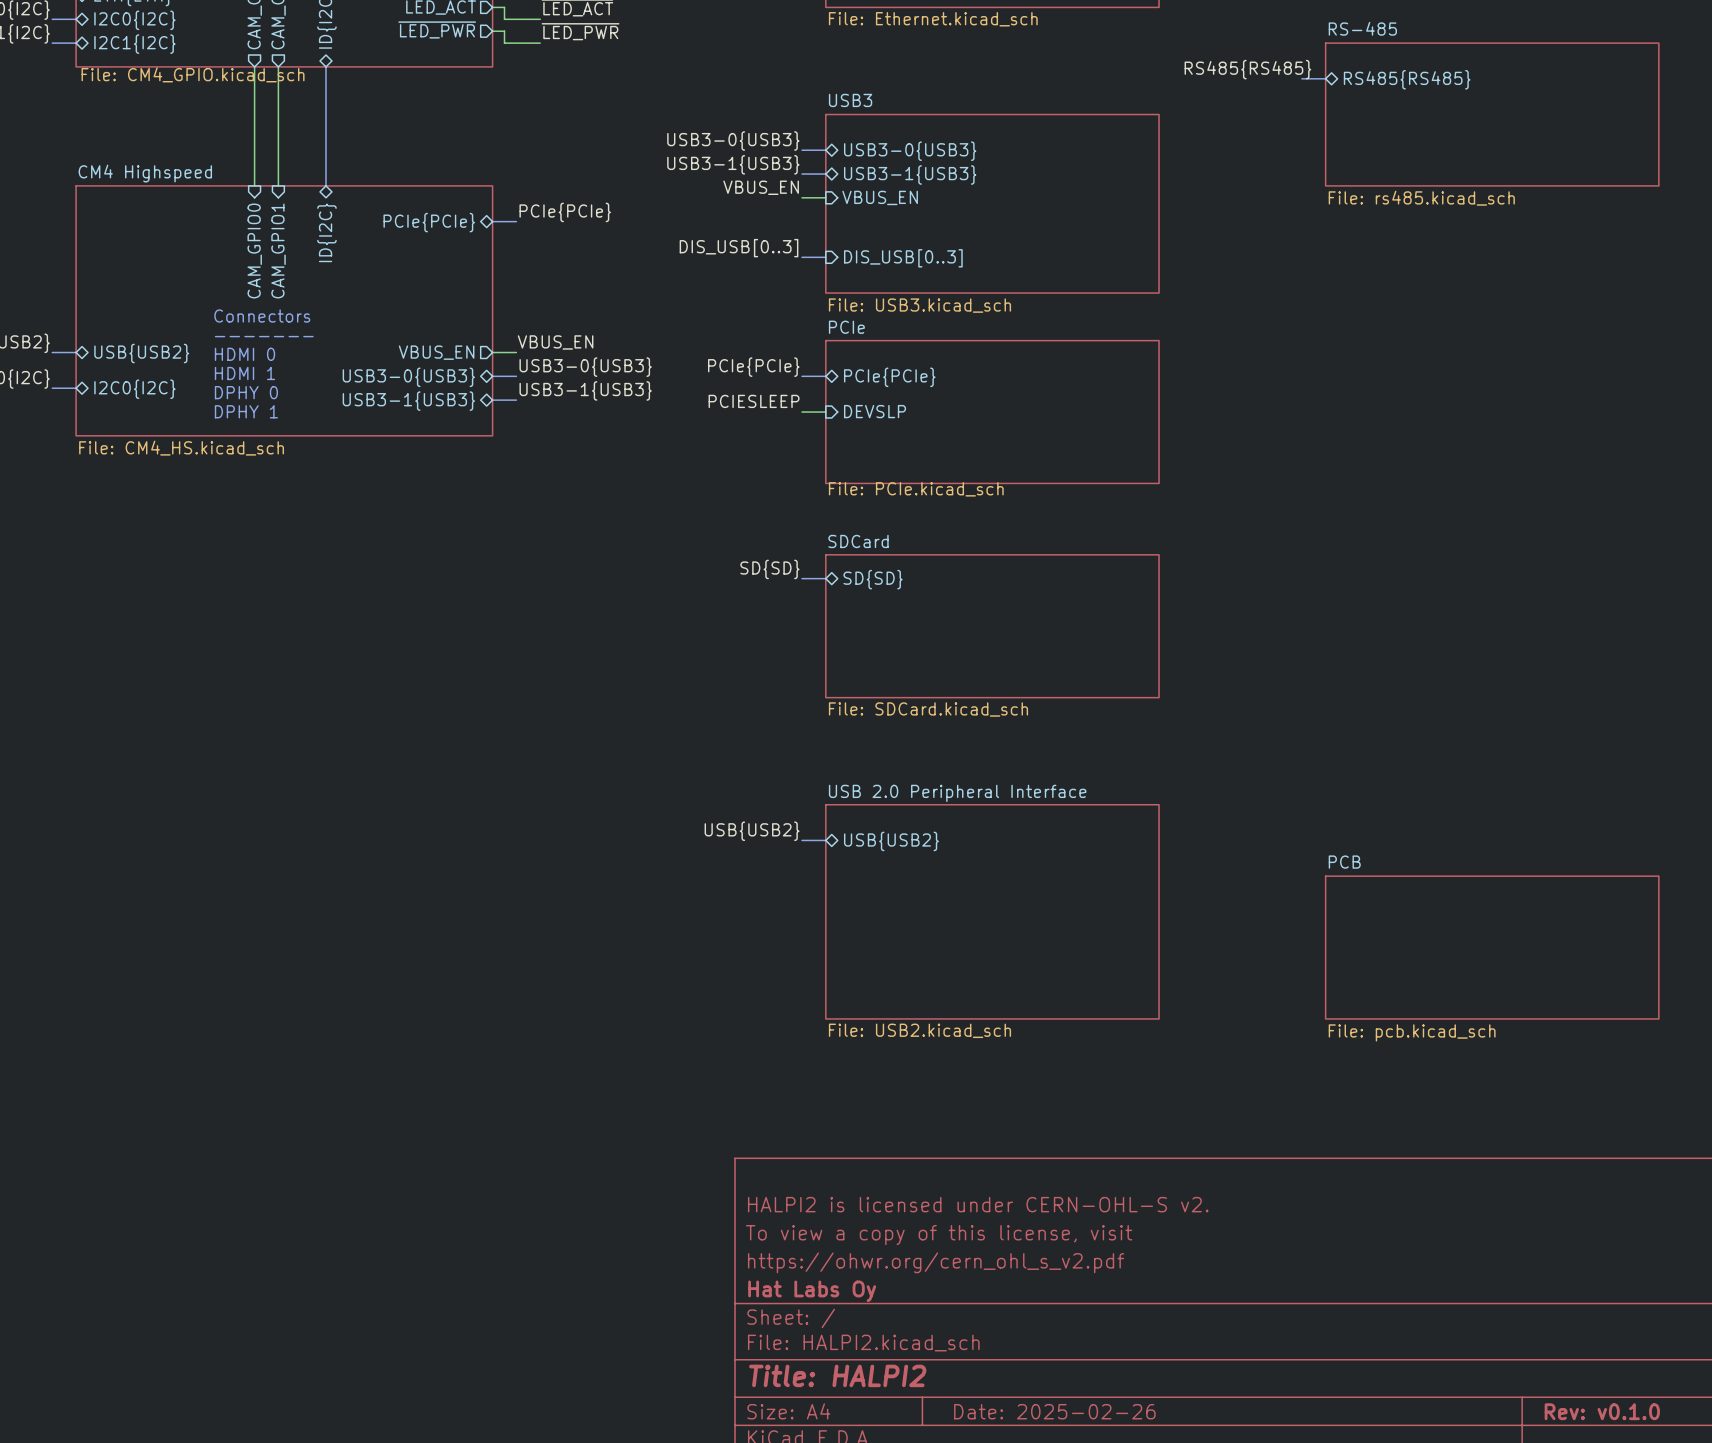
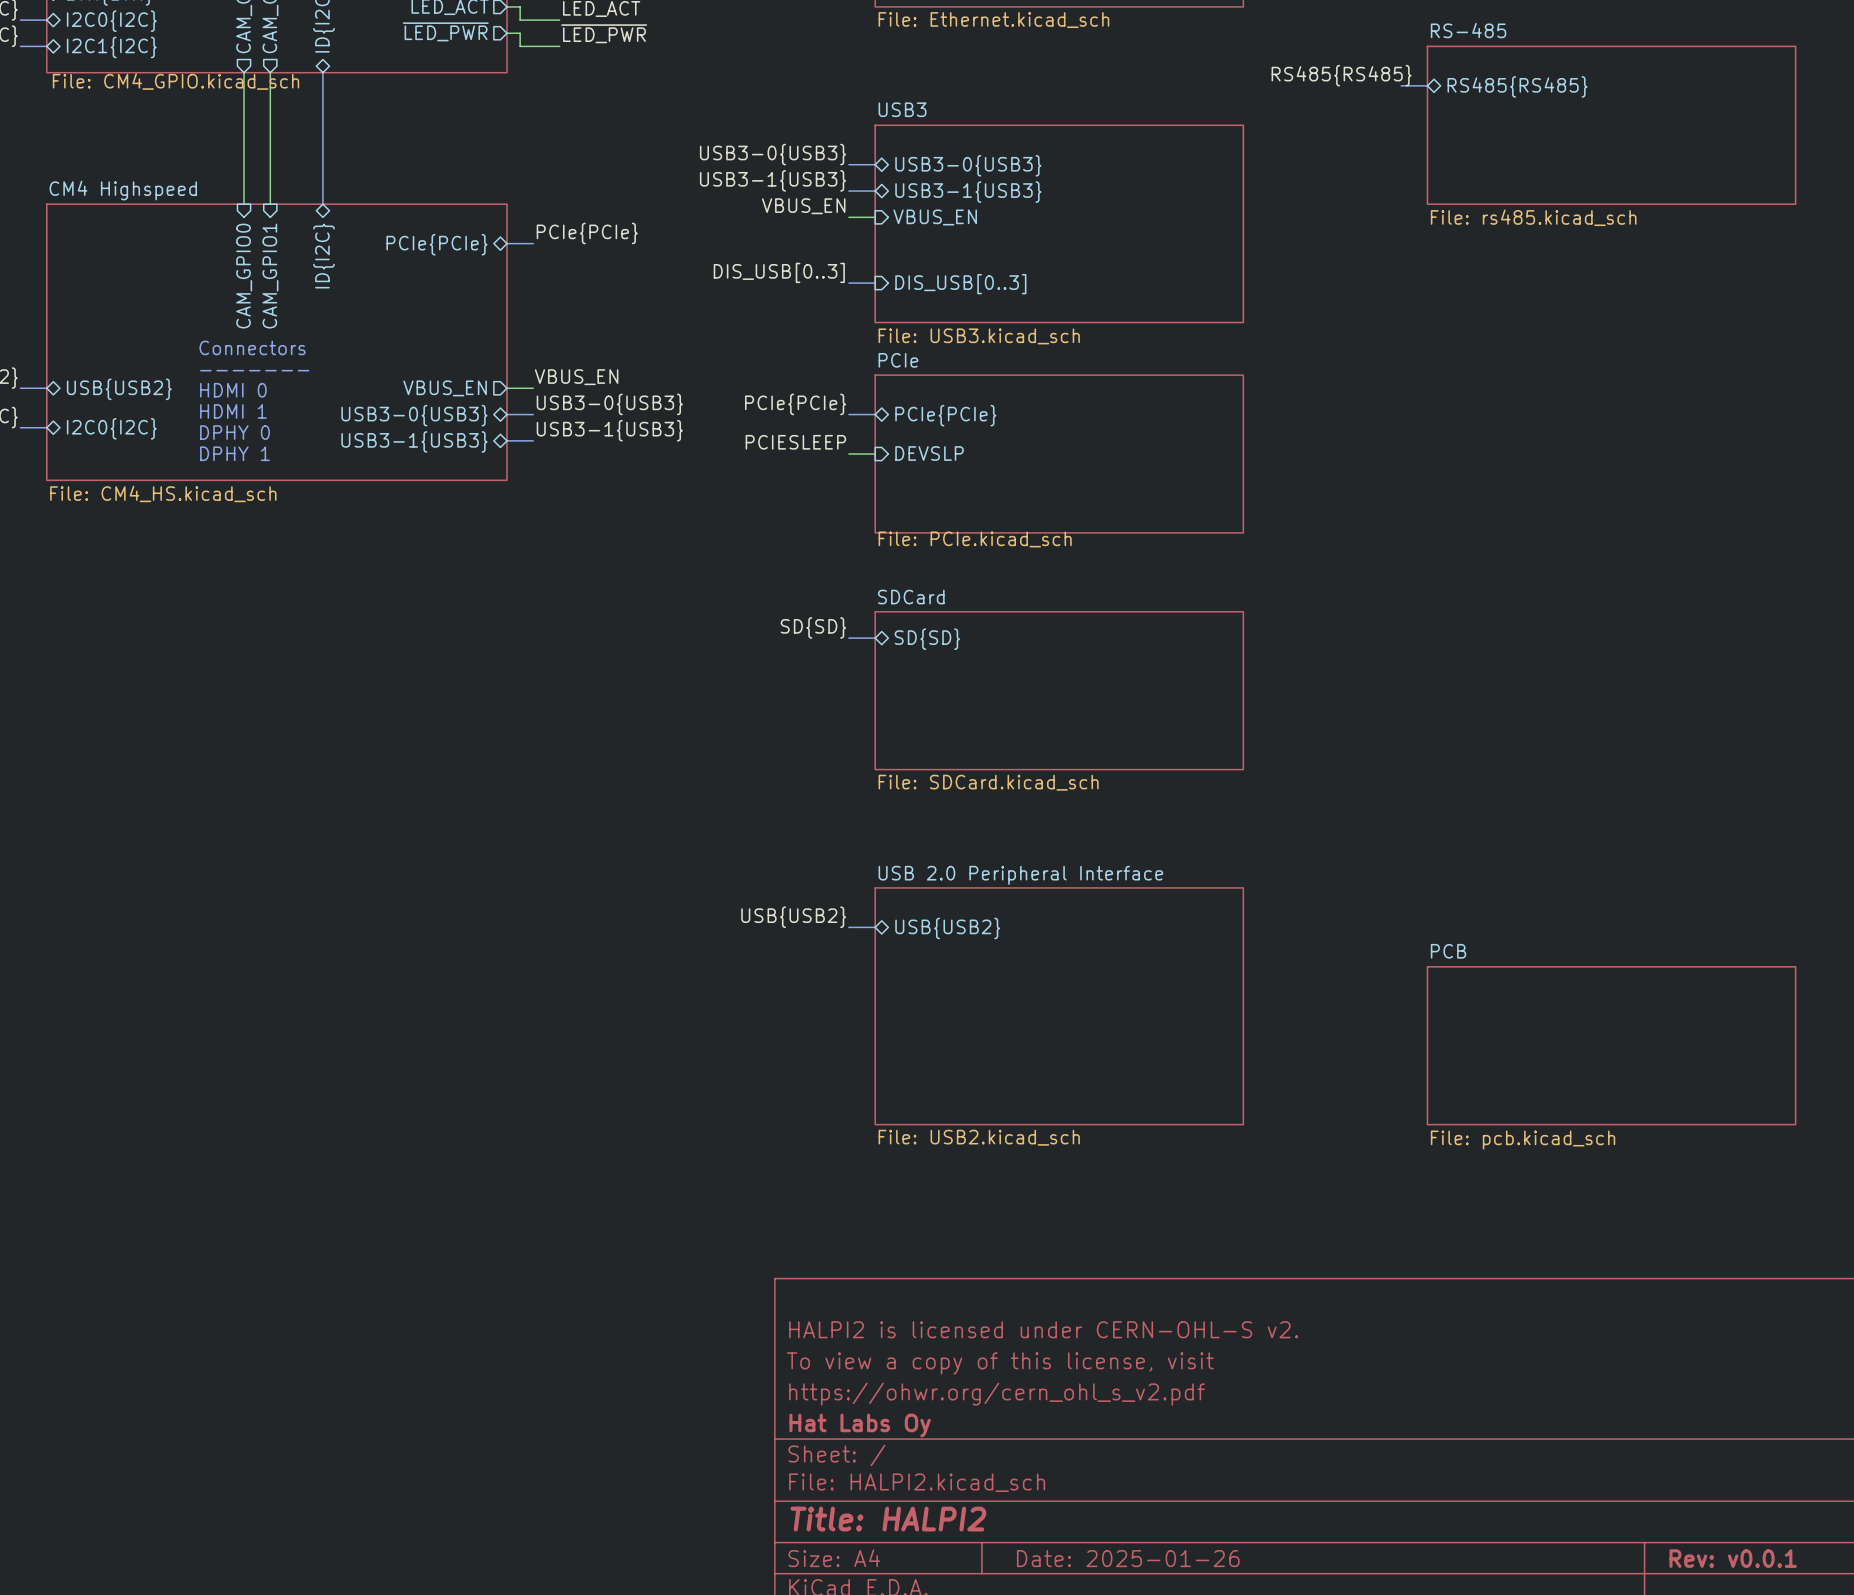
title block: Date: 2025-02-26 (1054, 1411) -> Date: 2025-01-26 (1128, 1558)
title block: Rev: v0.1.0 (1602, 1411) -> Rev: v0.0.1 (1733, 1558)

